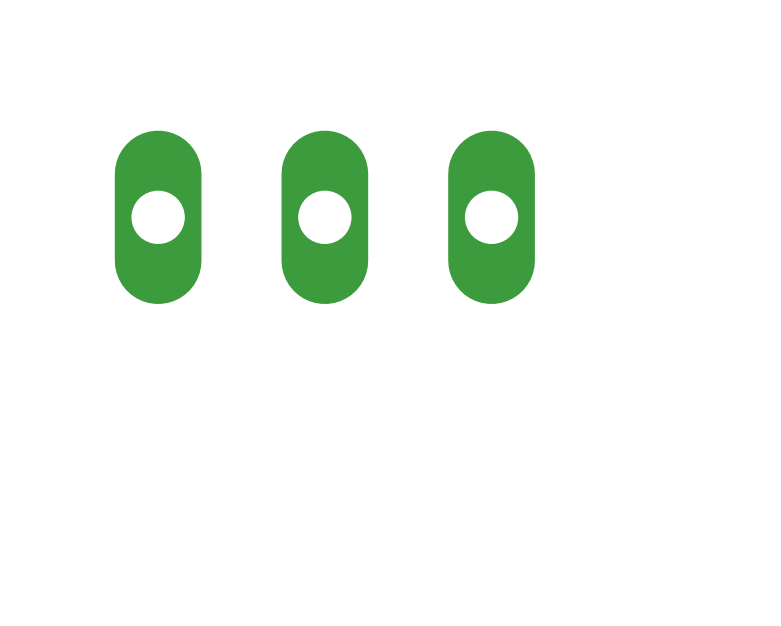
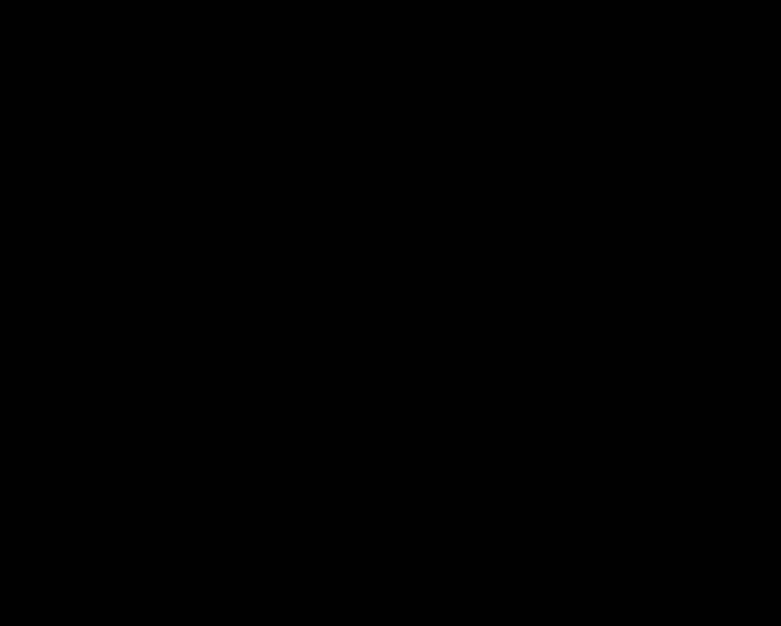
part: (324, 217) -> none

